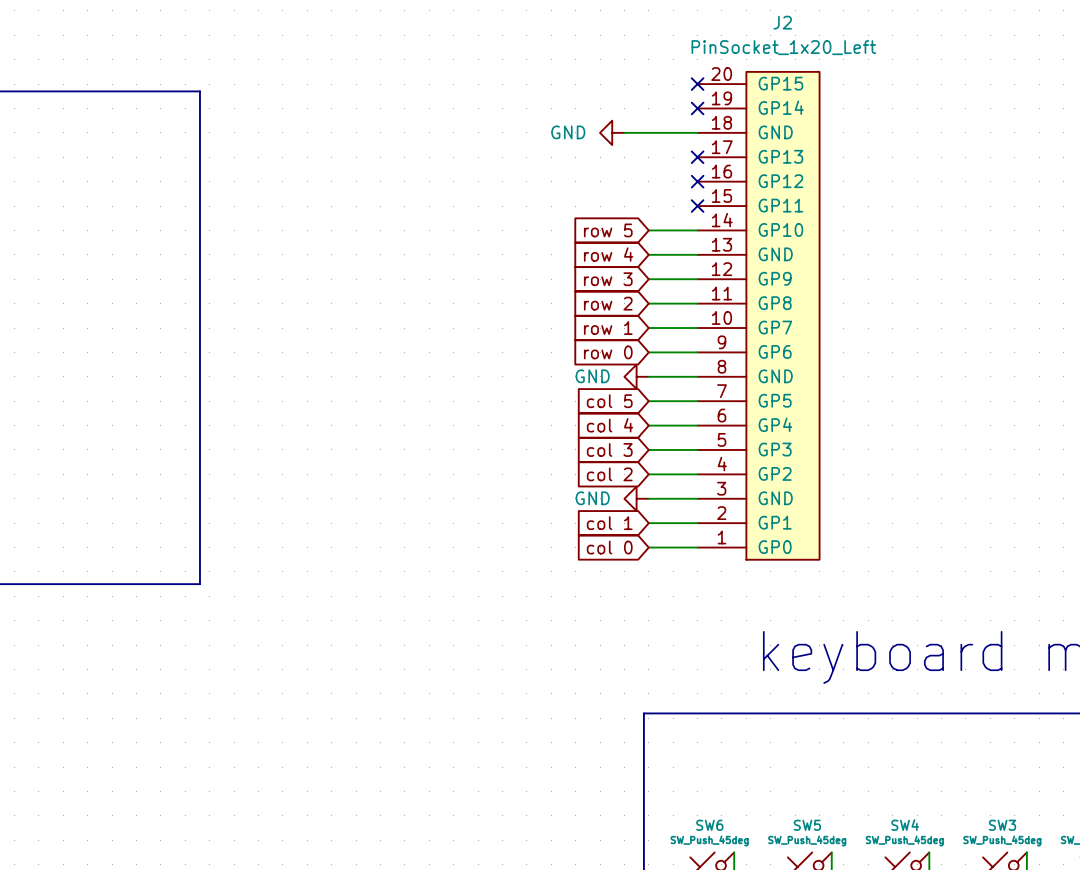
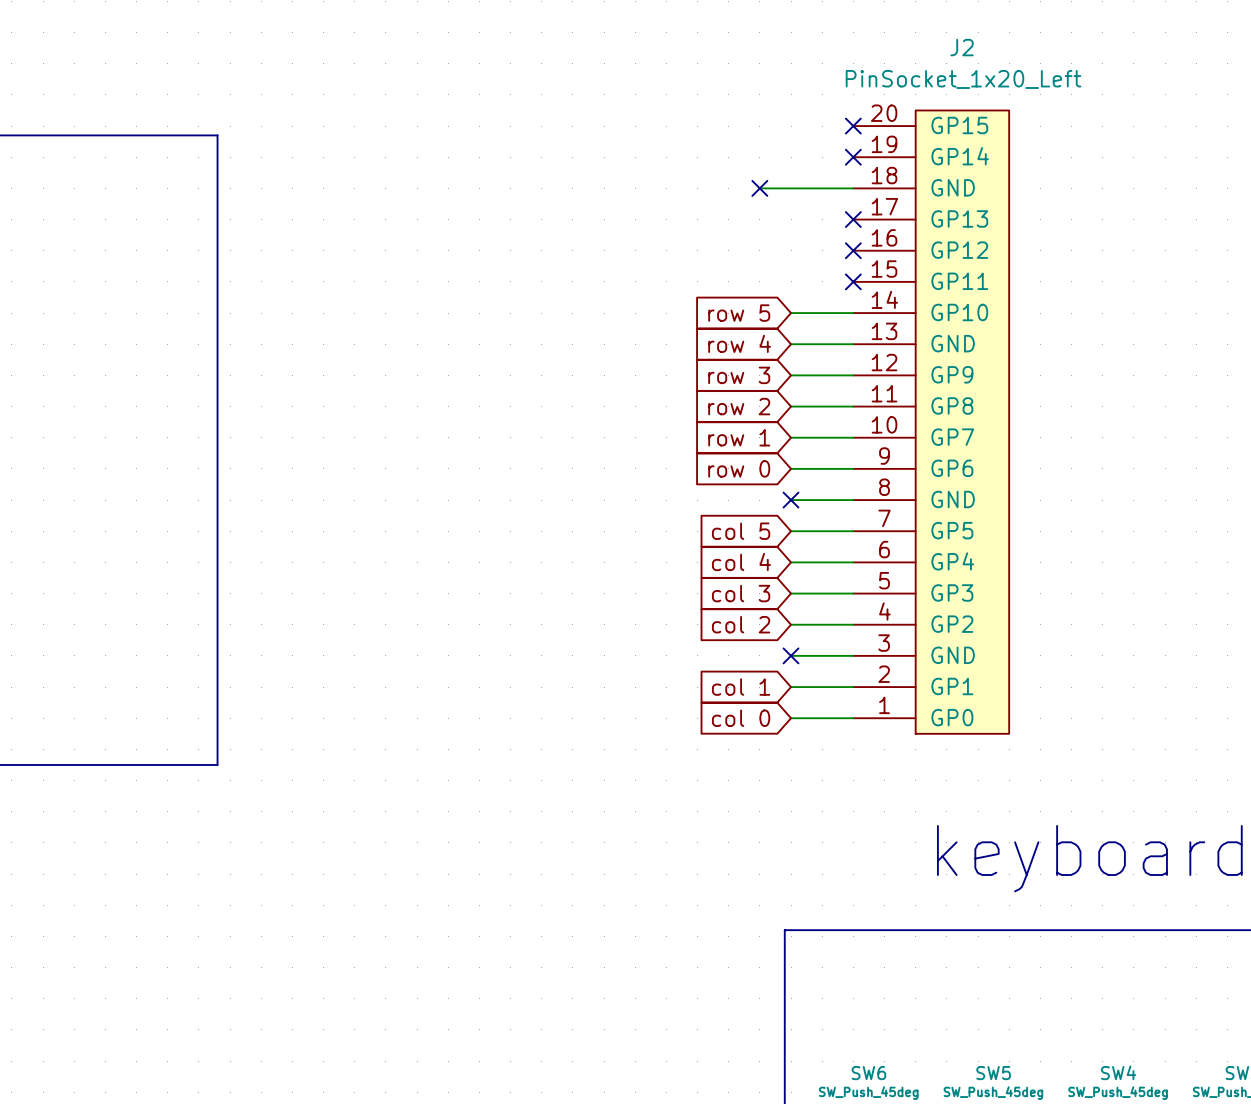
power symbol: GND (612, 132) -> none
no-connect mark: none -> (759, 188)
power symbol: GND (636, 376) -> none
no-connect mark: none -> (791, 500)
power symbol: GND (636, 498) -> none
no-connect mark: none -> (791, 655)

